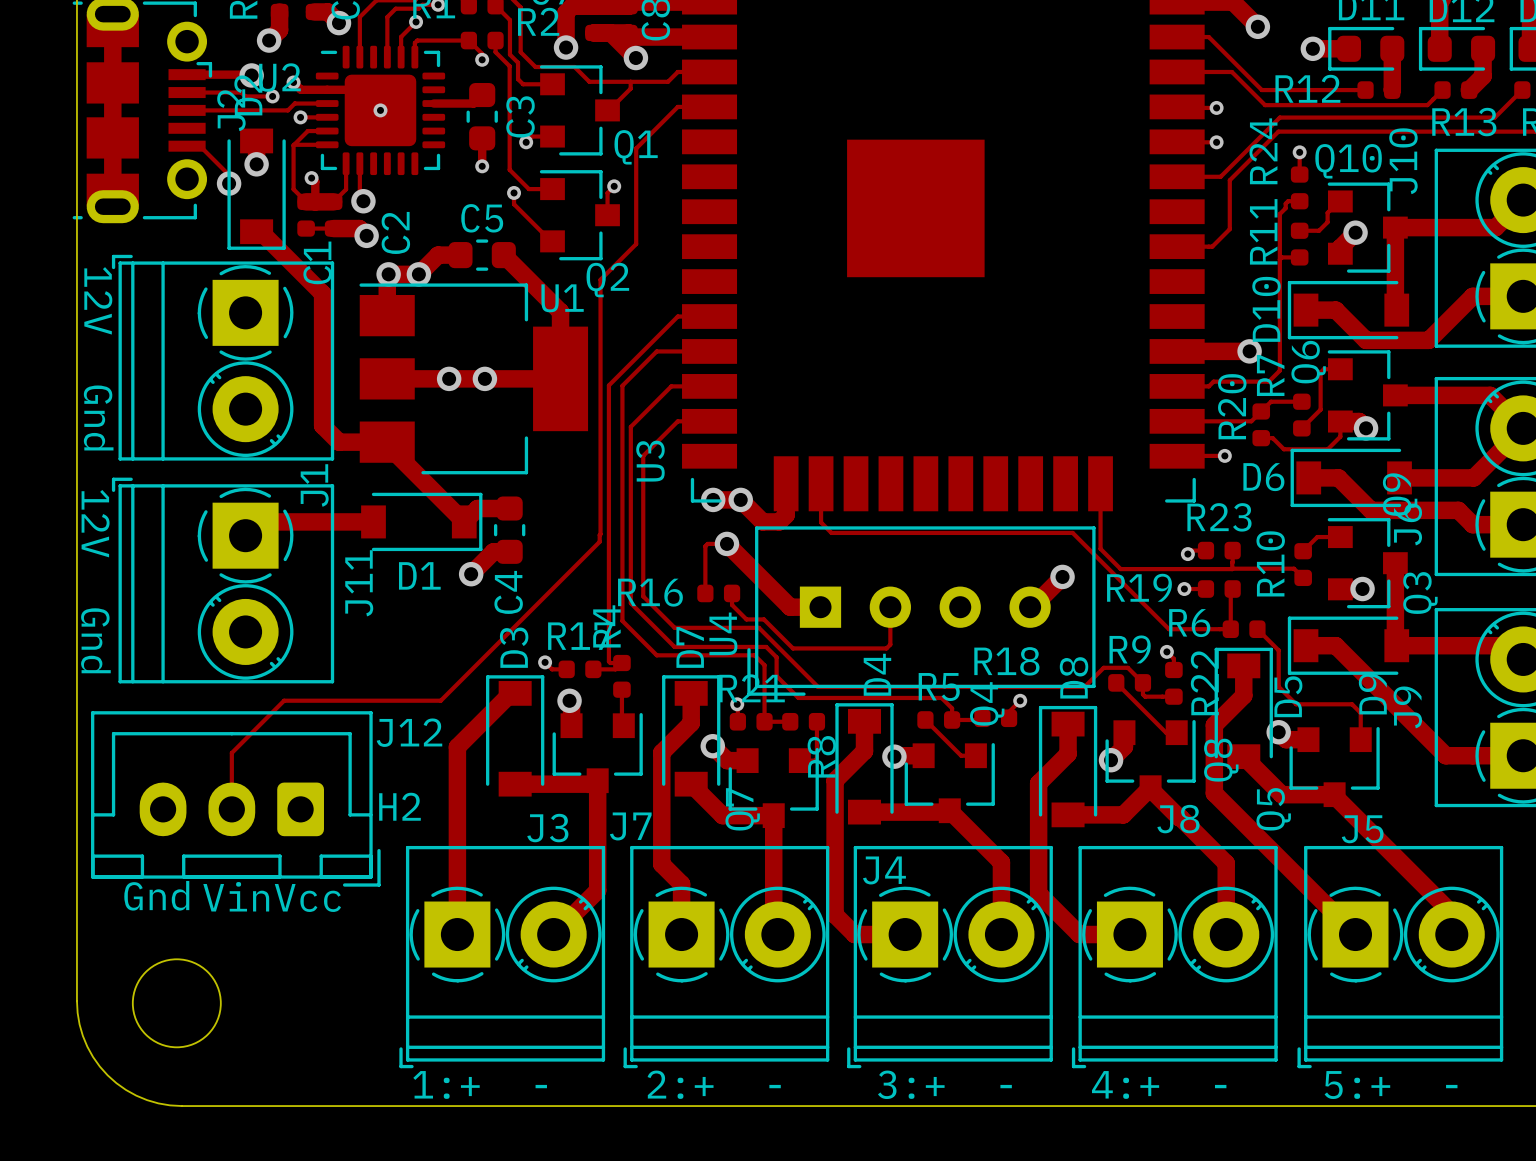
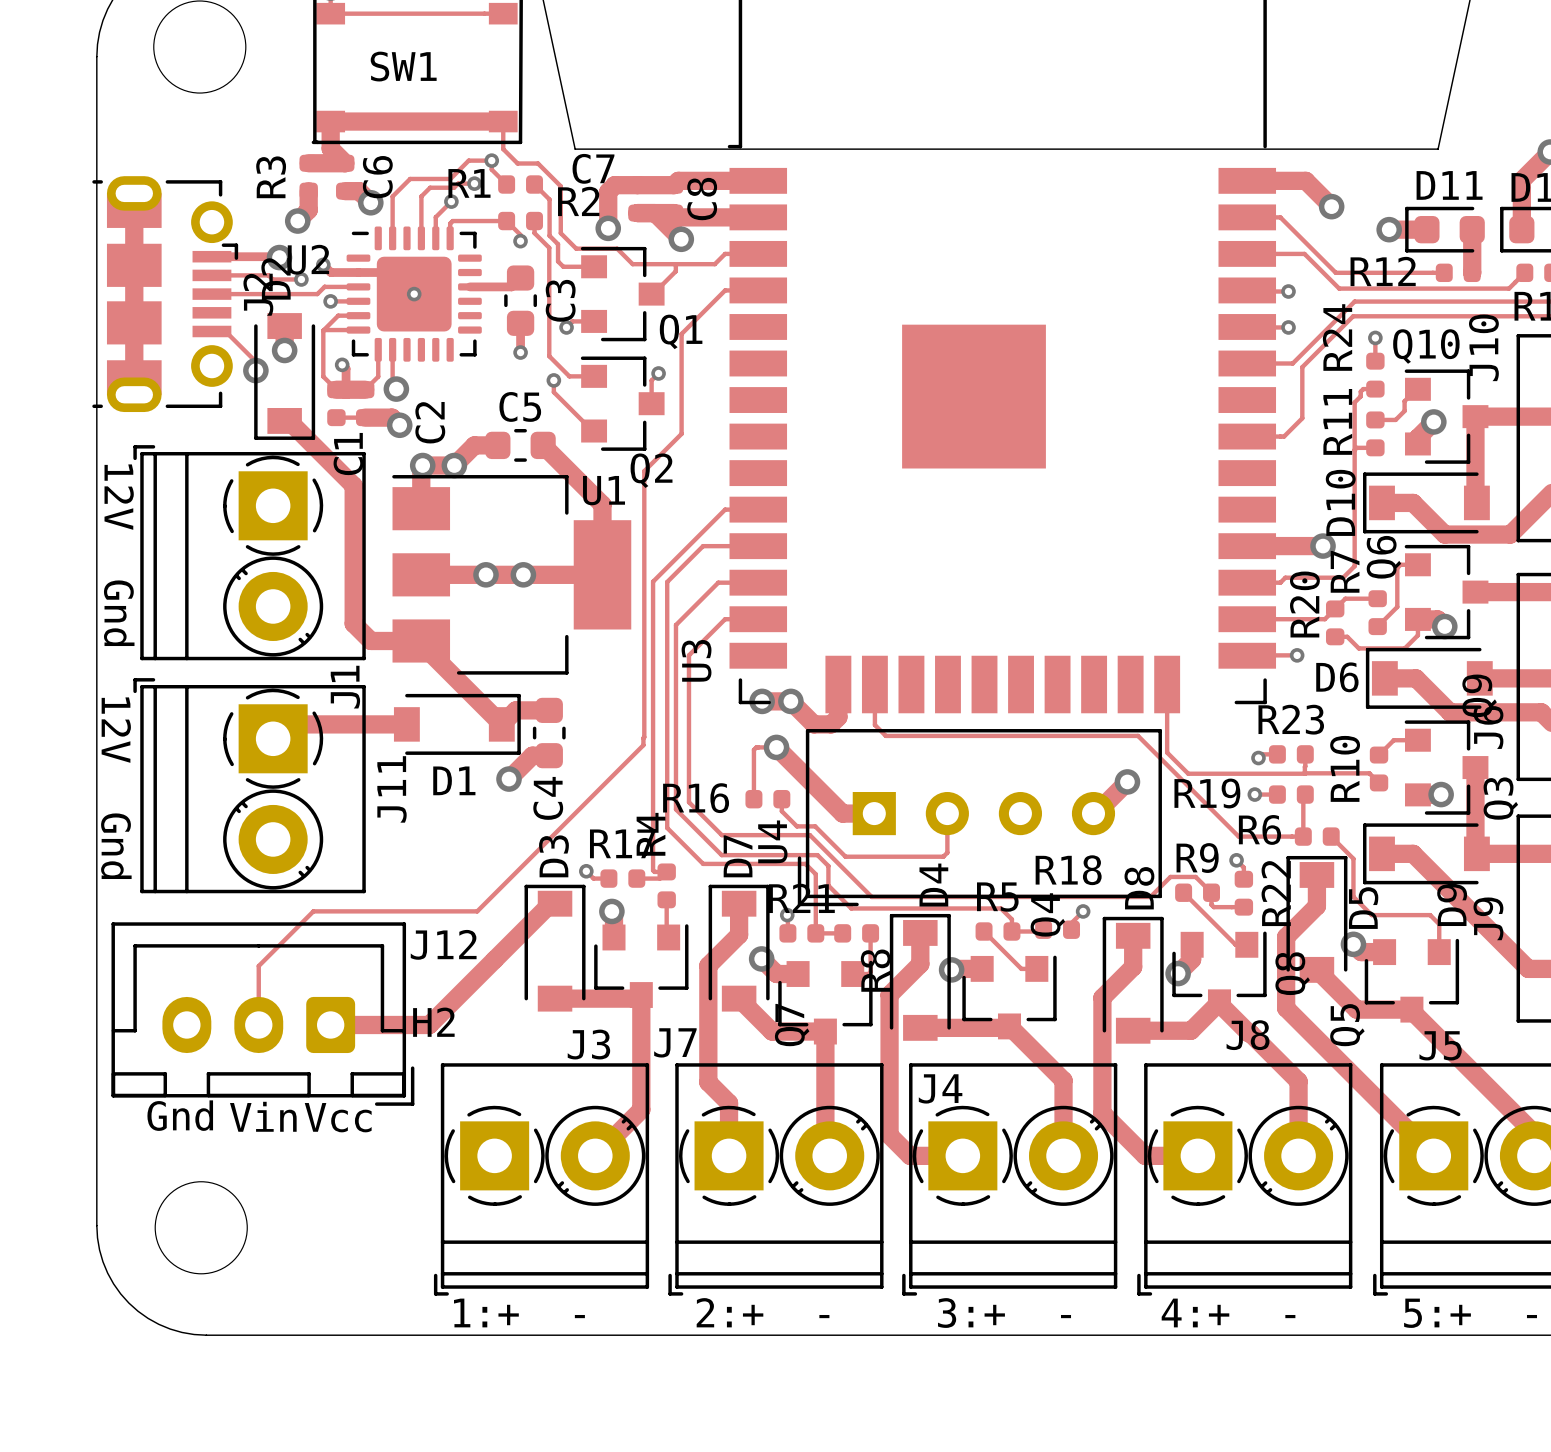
track: (457, 747) (457, 934) -> (494, 959) (429, 1024) (330, 1024)

